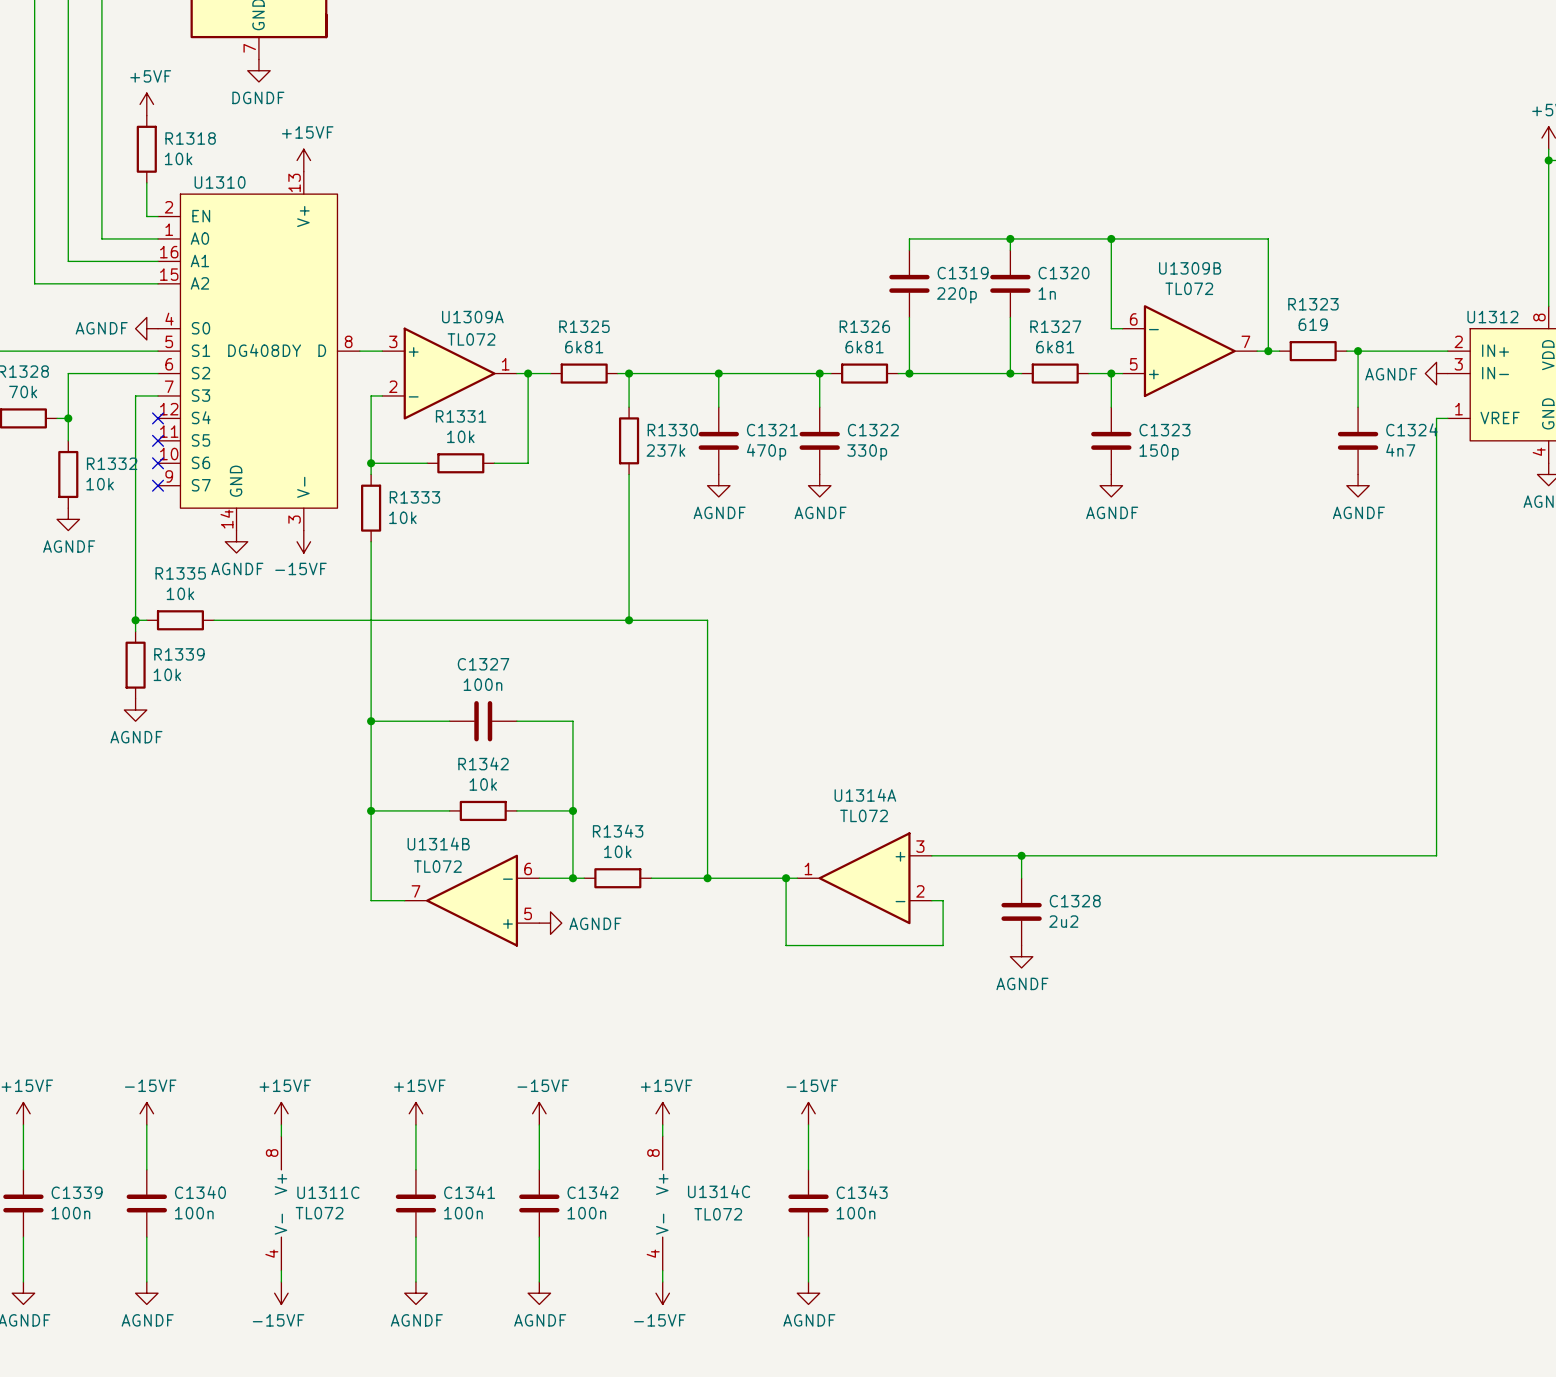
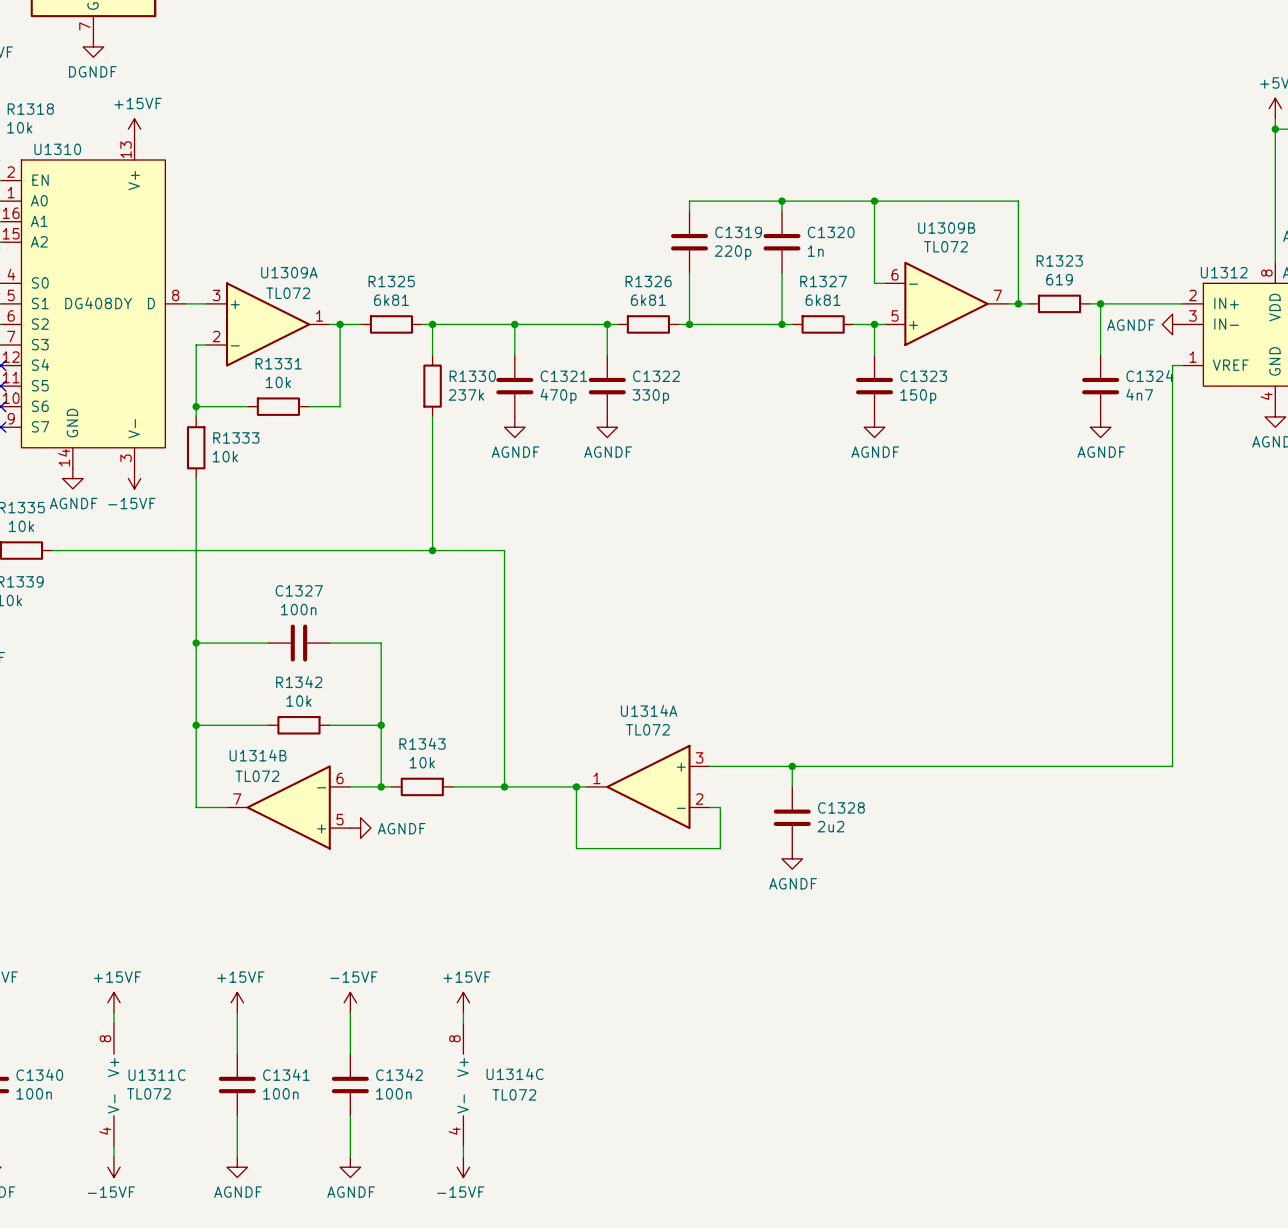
power symbol: -15VF (808, 1113) -> none
wire: (808, 1124) (808, 1169) -> none
C1343: 100n (808, 1203) -> none
wire: (808, 1237) (808, 1281) -> none
power symbol: AGNDF (808, 1293) -> none

